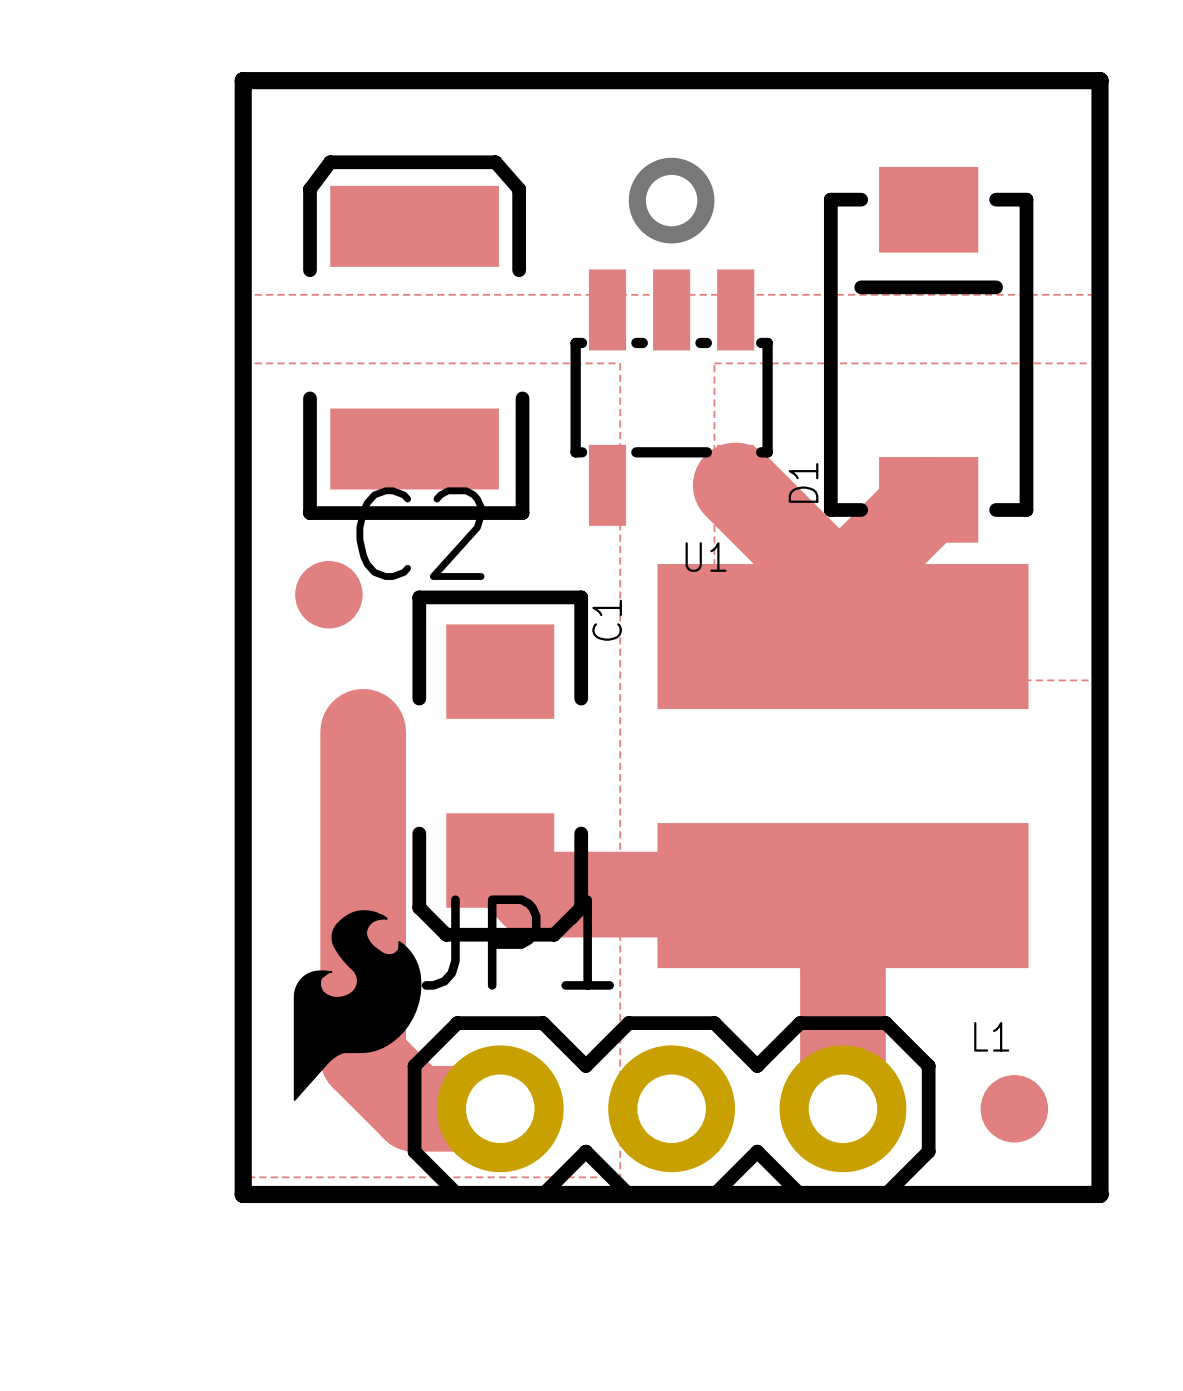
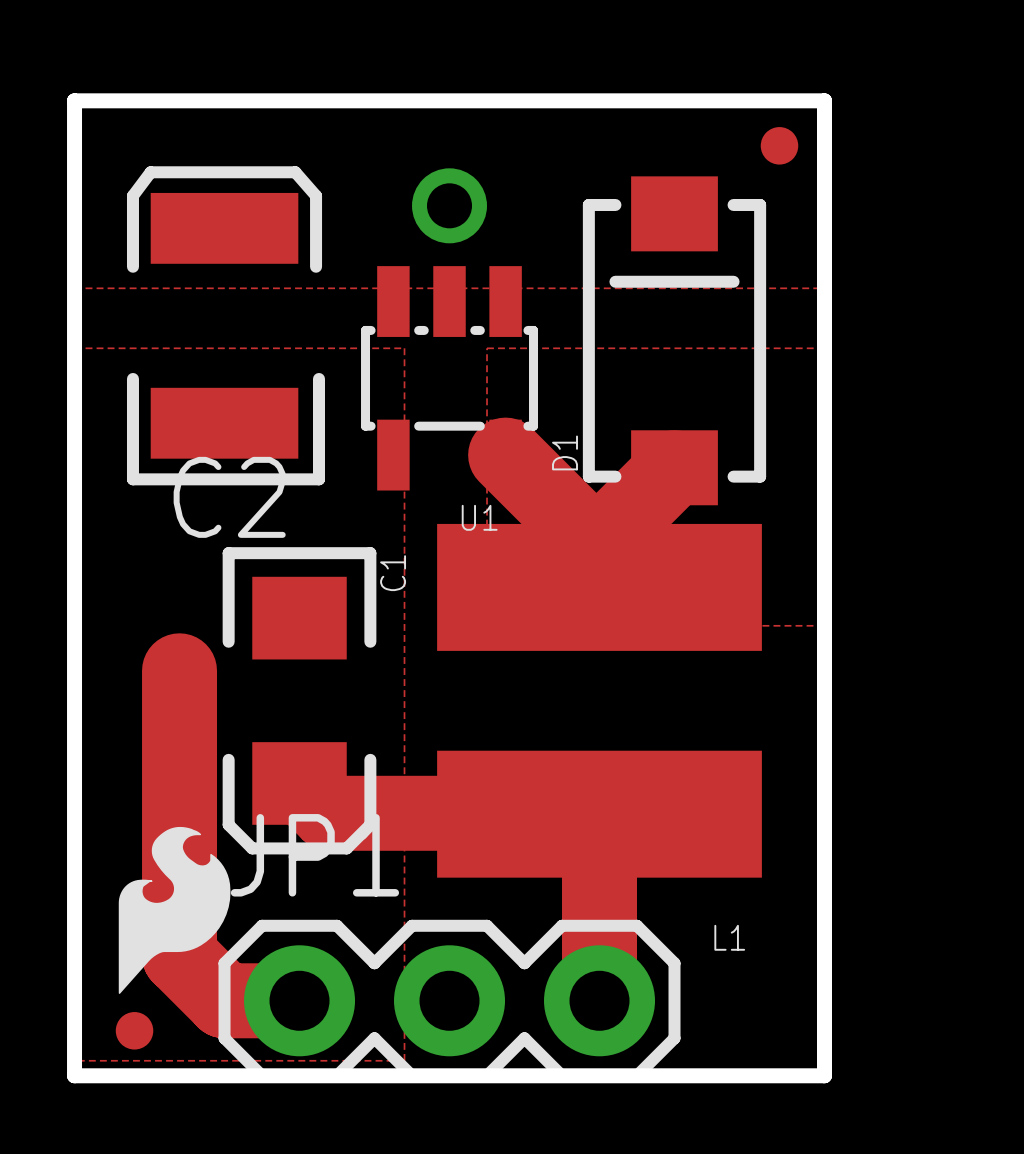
part: none -> (779, 145)
part: (328, 594) -> none
part: (1014, 1108) -> none
part: none -> (134, 1030)

